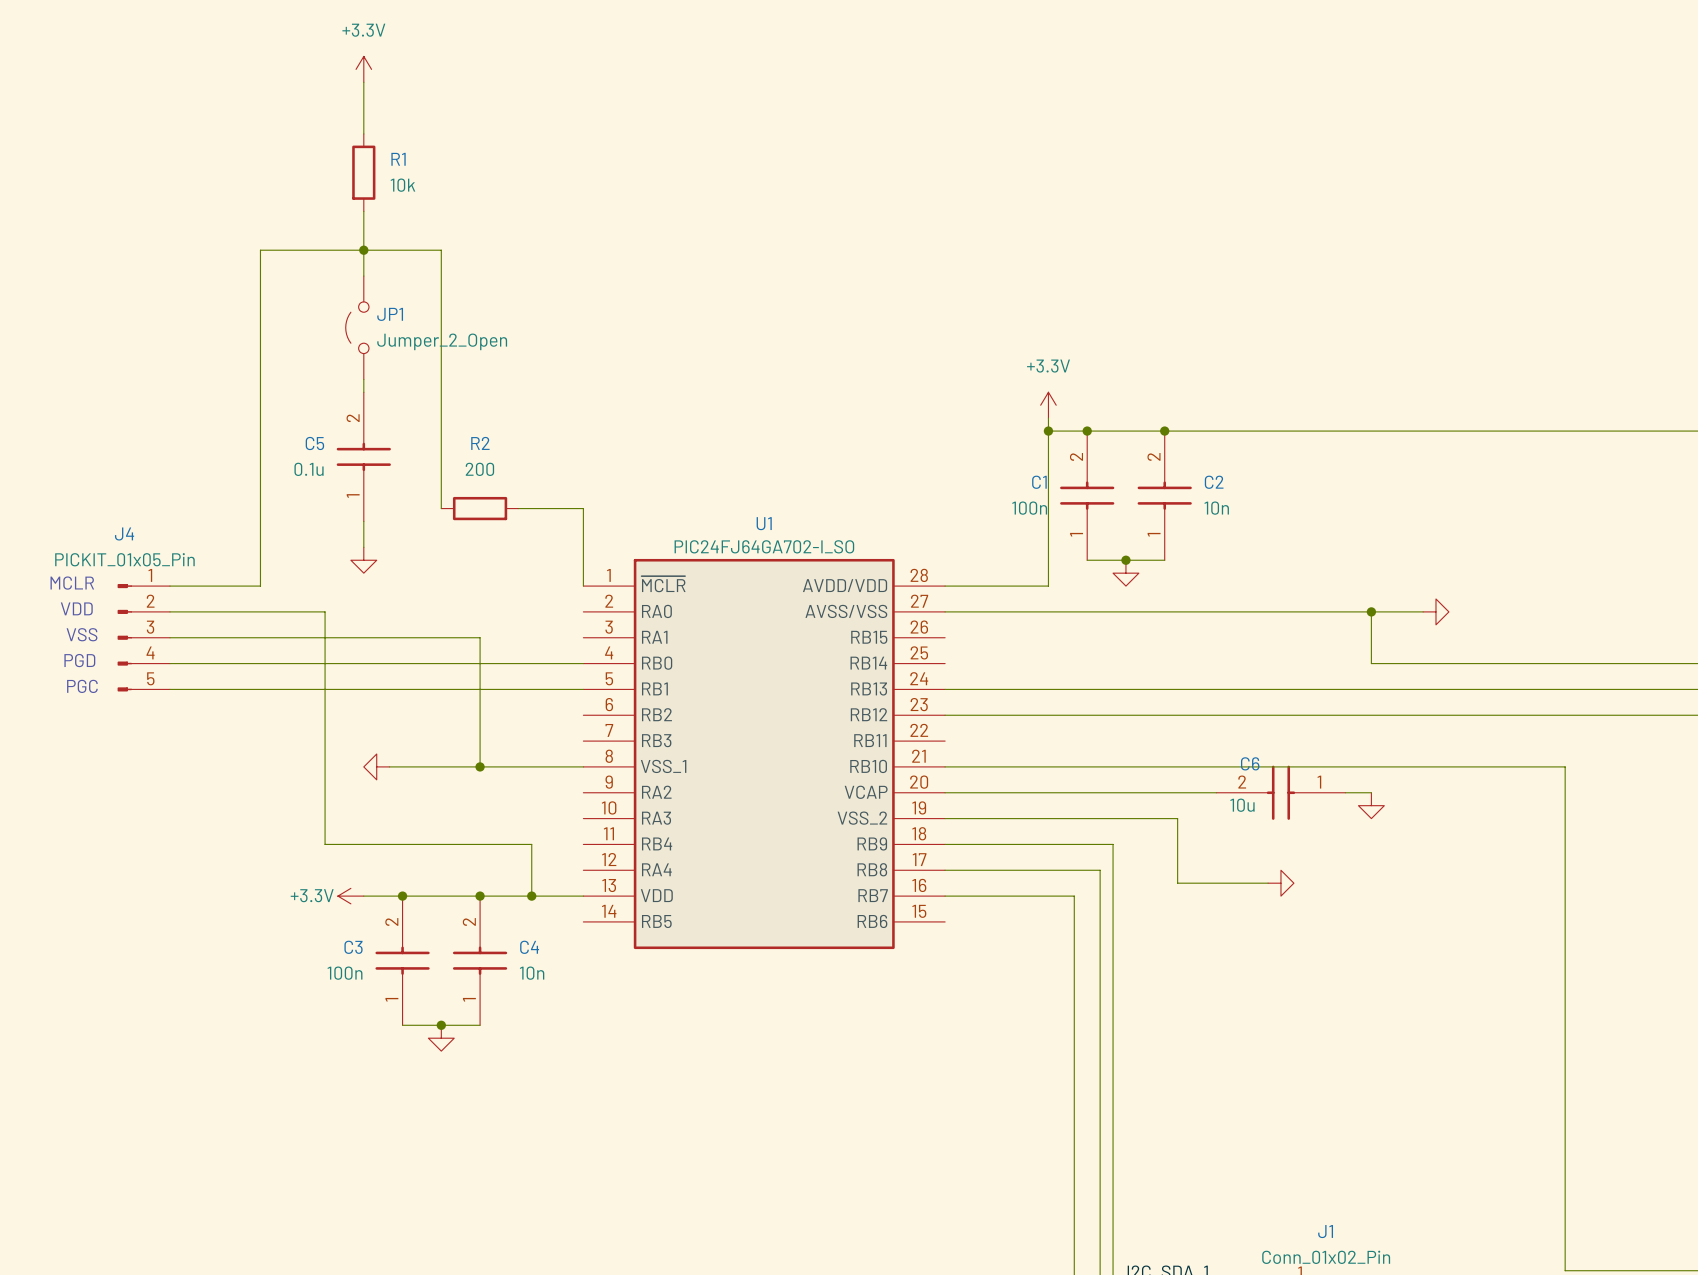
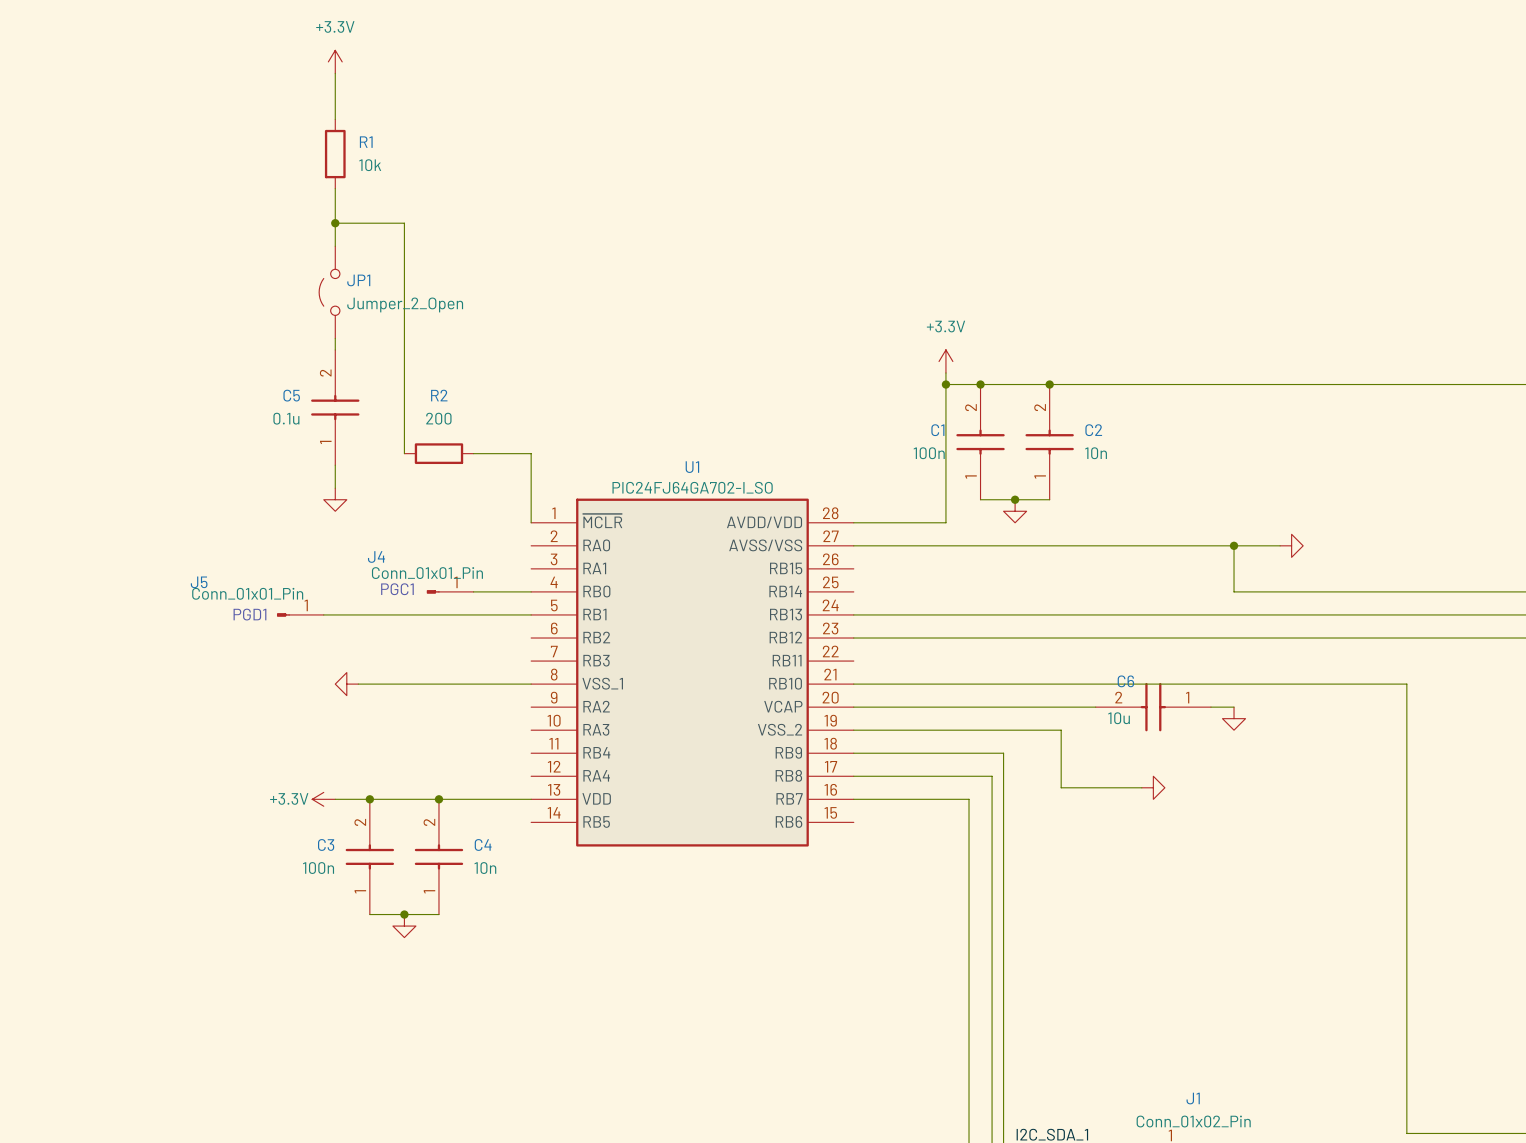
wire: (363, 250) (260, 250) (260, 586) (170, 586) -> none
J4 name position: J4 (124, 533) -> J4 (376, 556)
J4 value: PICKIT_01x05_Pin (124, 559) -> Conn_01x01_Pin (427, 573)
text: MCLR (72, 583) -> none
J4 symbol: [117, 584, 171, 692] -> [426, 590, 474, 594]
text: VDD (76, 608) -> none
wire: (170, 611) (325, 611) (325, 844) (531, 844) (531, 896) -> none
text: VSS (82, 634) -> none
wire: (170, 637) (480, 637) (480, 766) -> none
text: PGD (79, 660) -> none
text: none -> PGC1 (397, 589)
wire: (170, 663) (518, 663) -> none
text: PGC (82, 686) -> none
text: none -> PGD1 (249, 614)
wire: (170, 689) (350, 689) -> none
J5: none -> Conn_01x01_Pin (300, 614)
junction: (480, 766) -> none
junction: (531, 896) -> none

